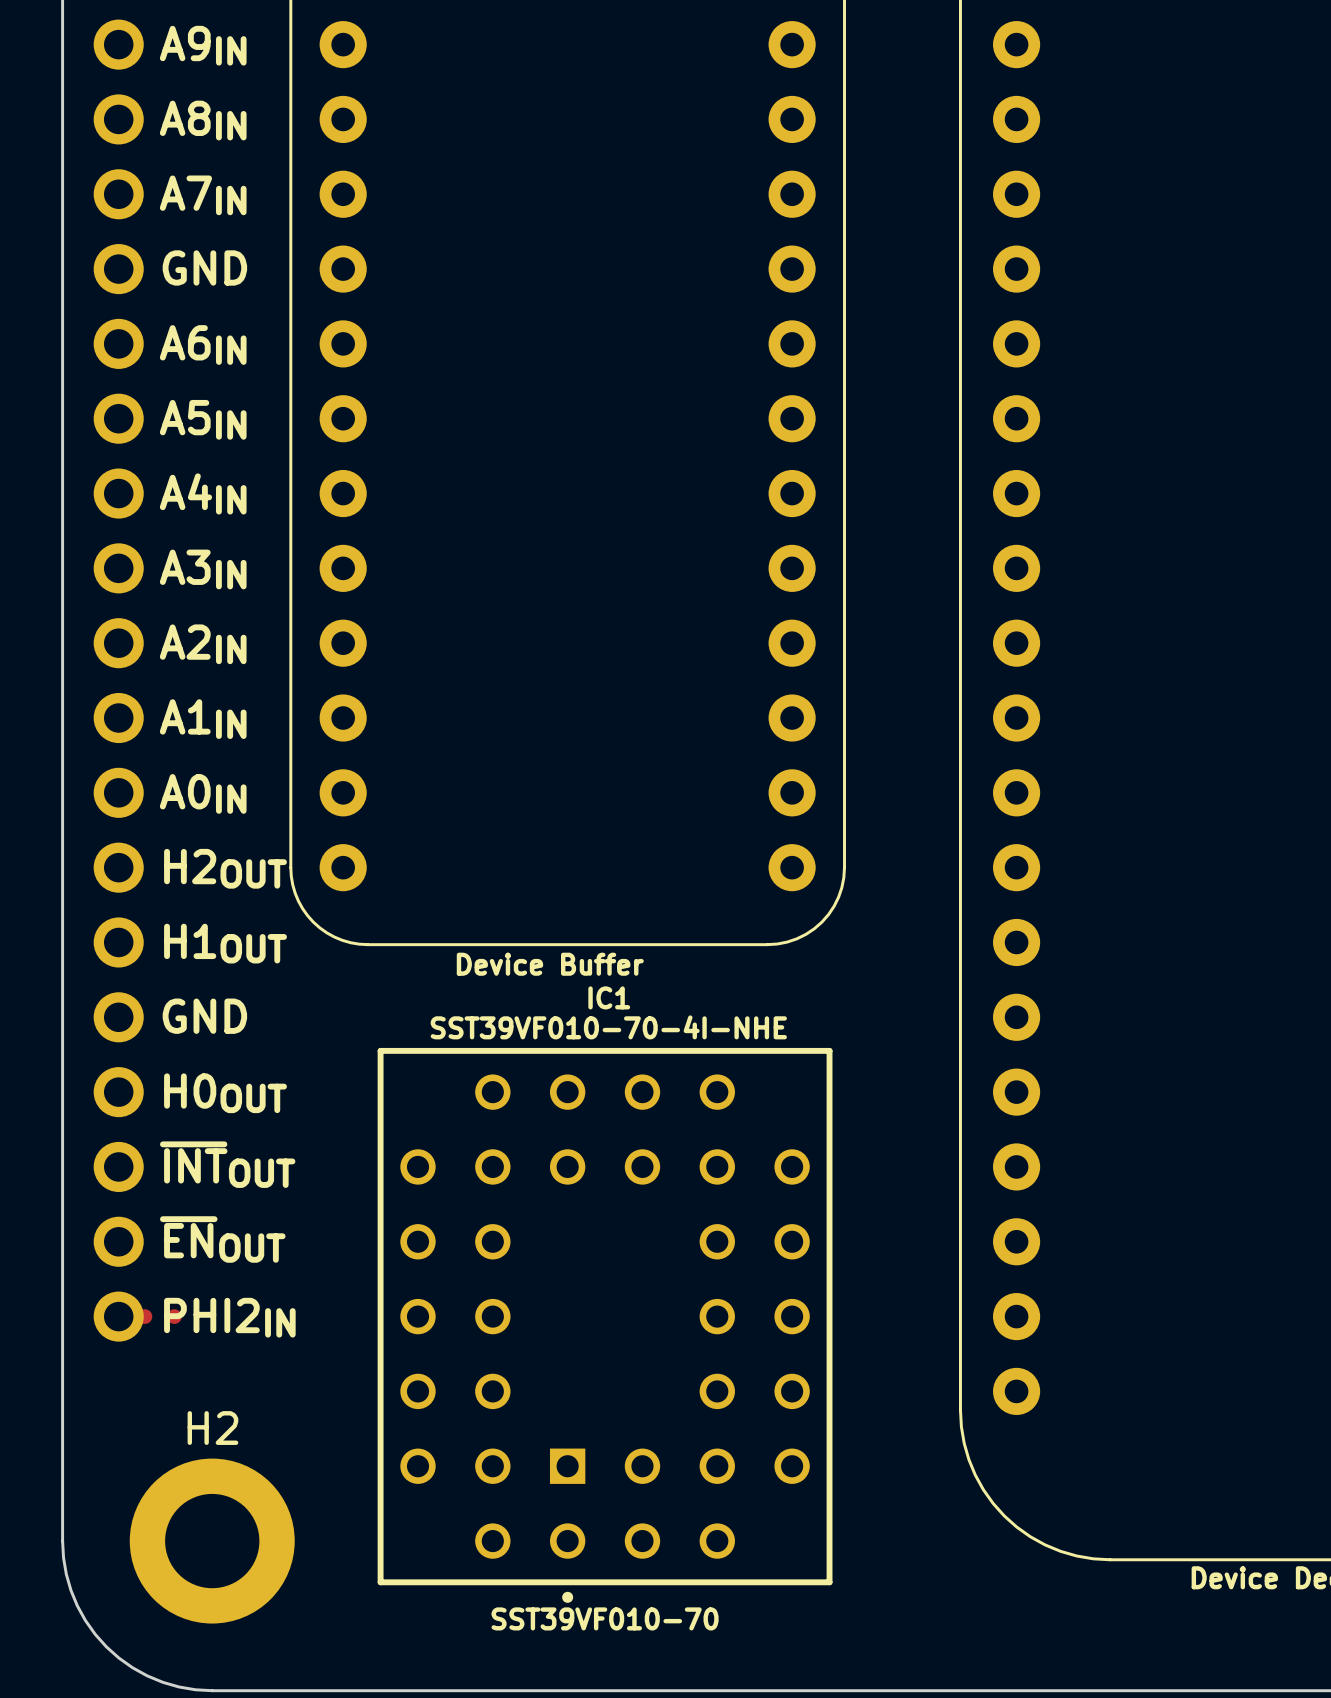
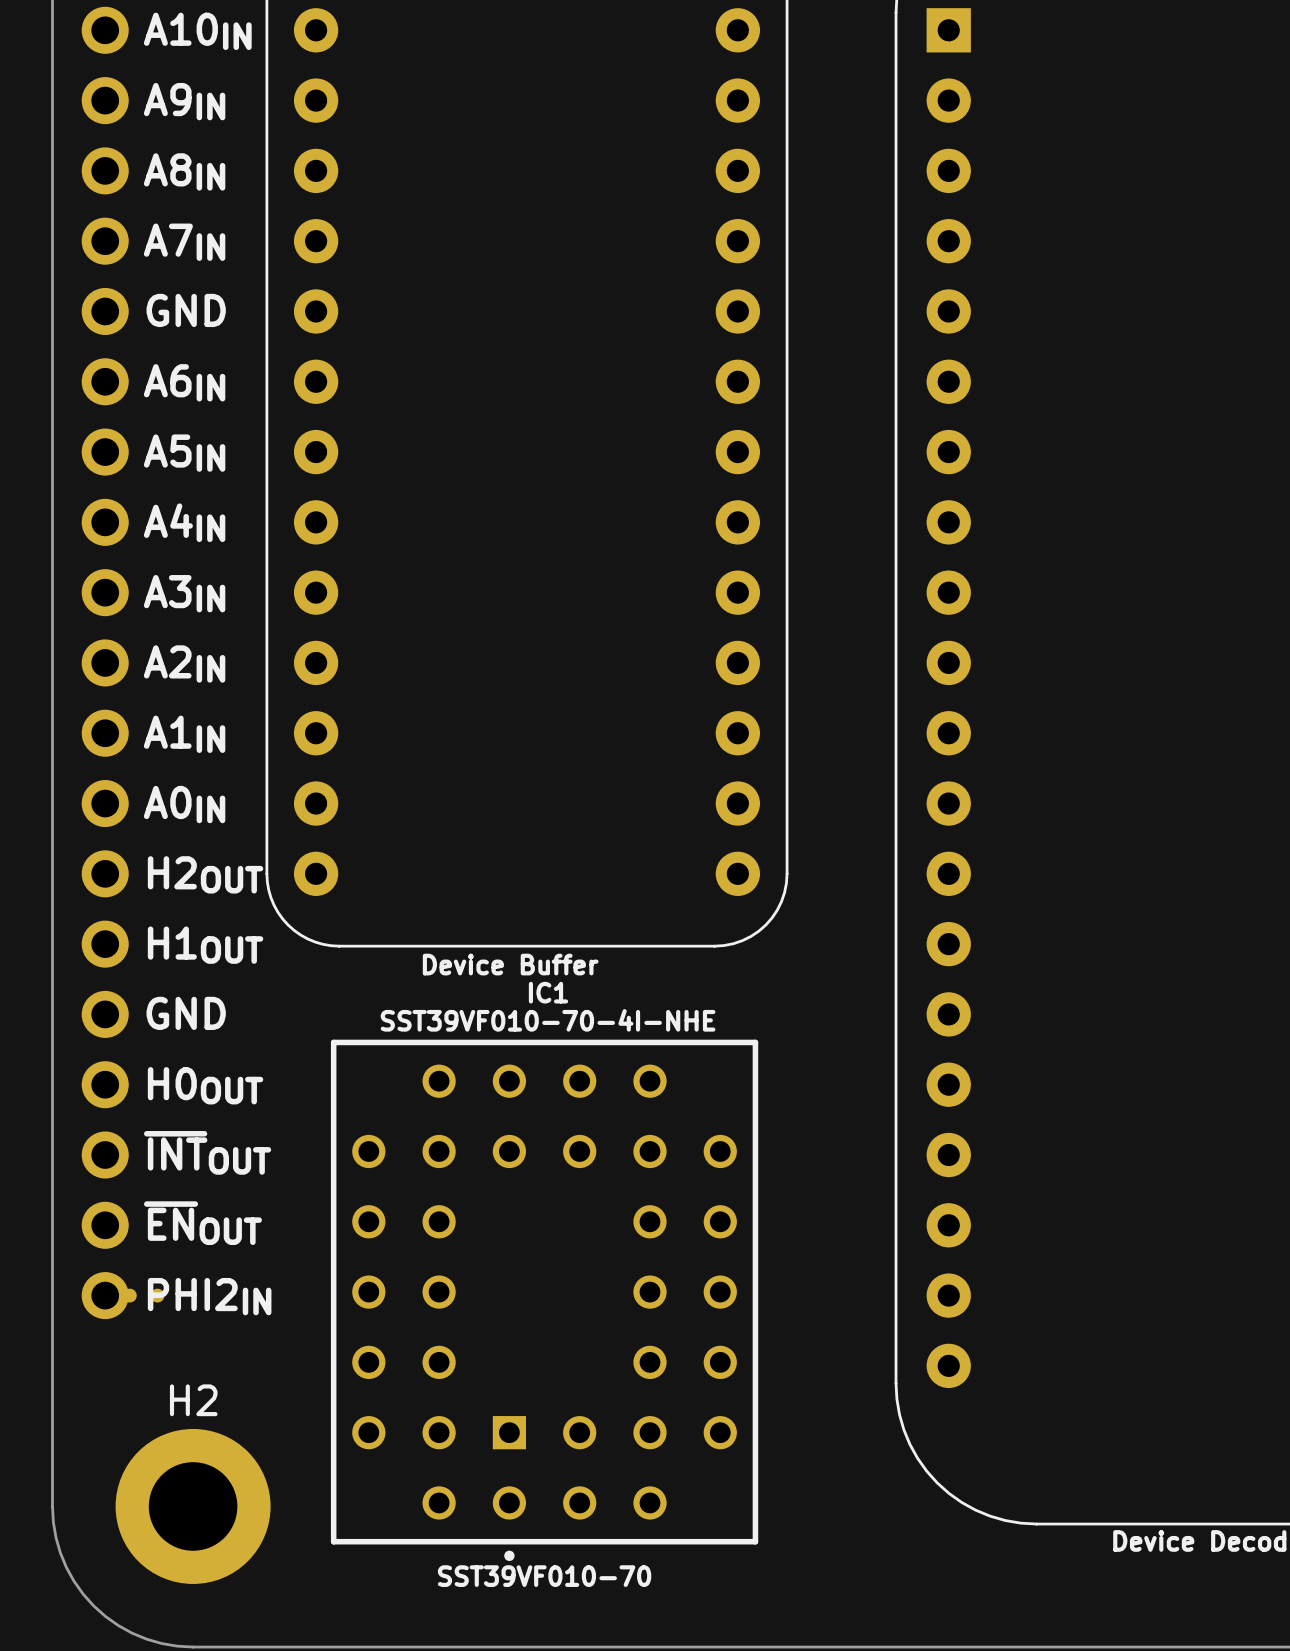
IC1 position: (605, 1325) -> (544, 1300)

